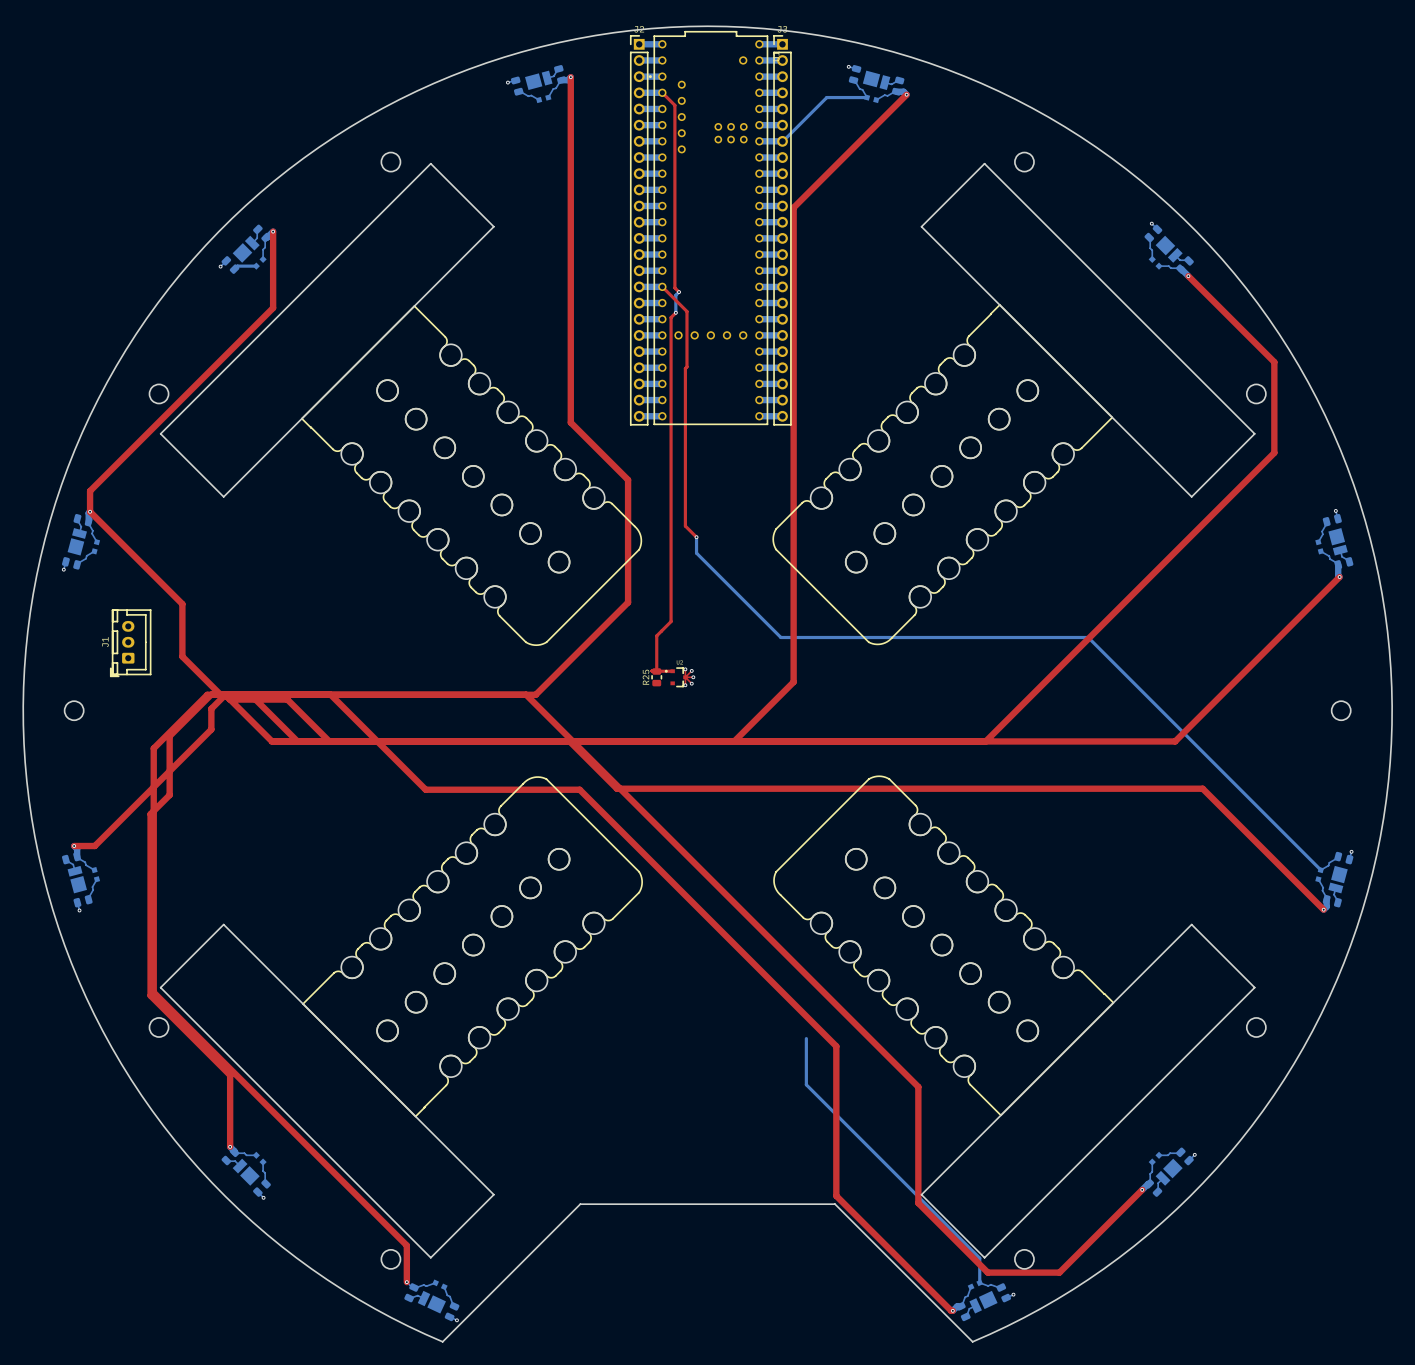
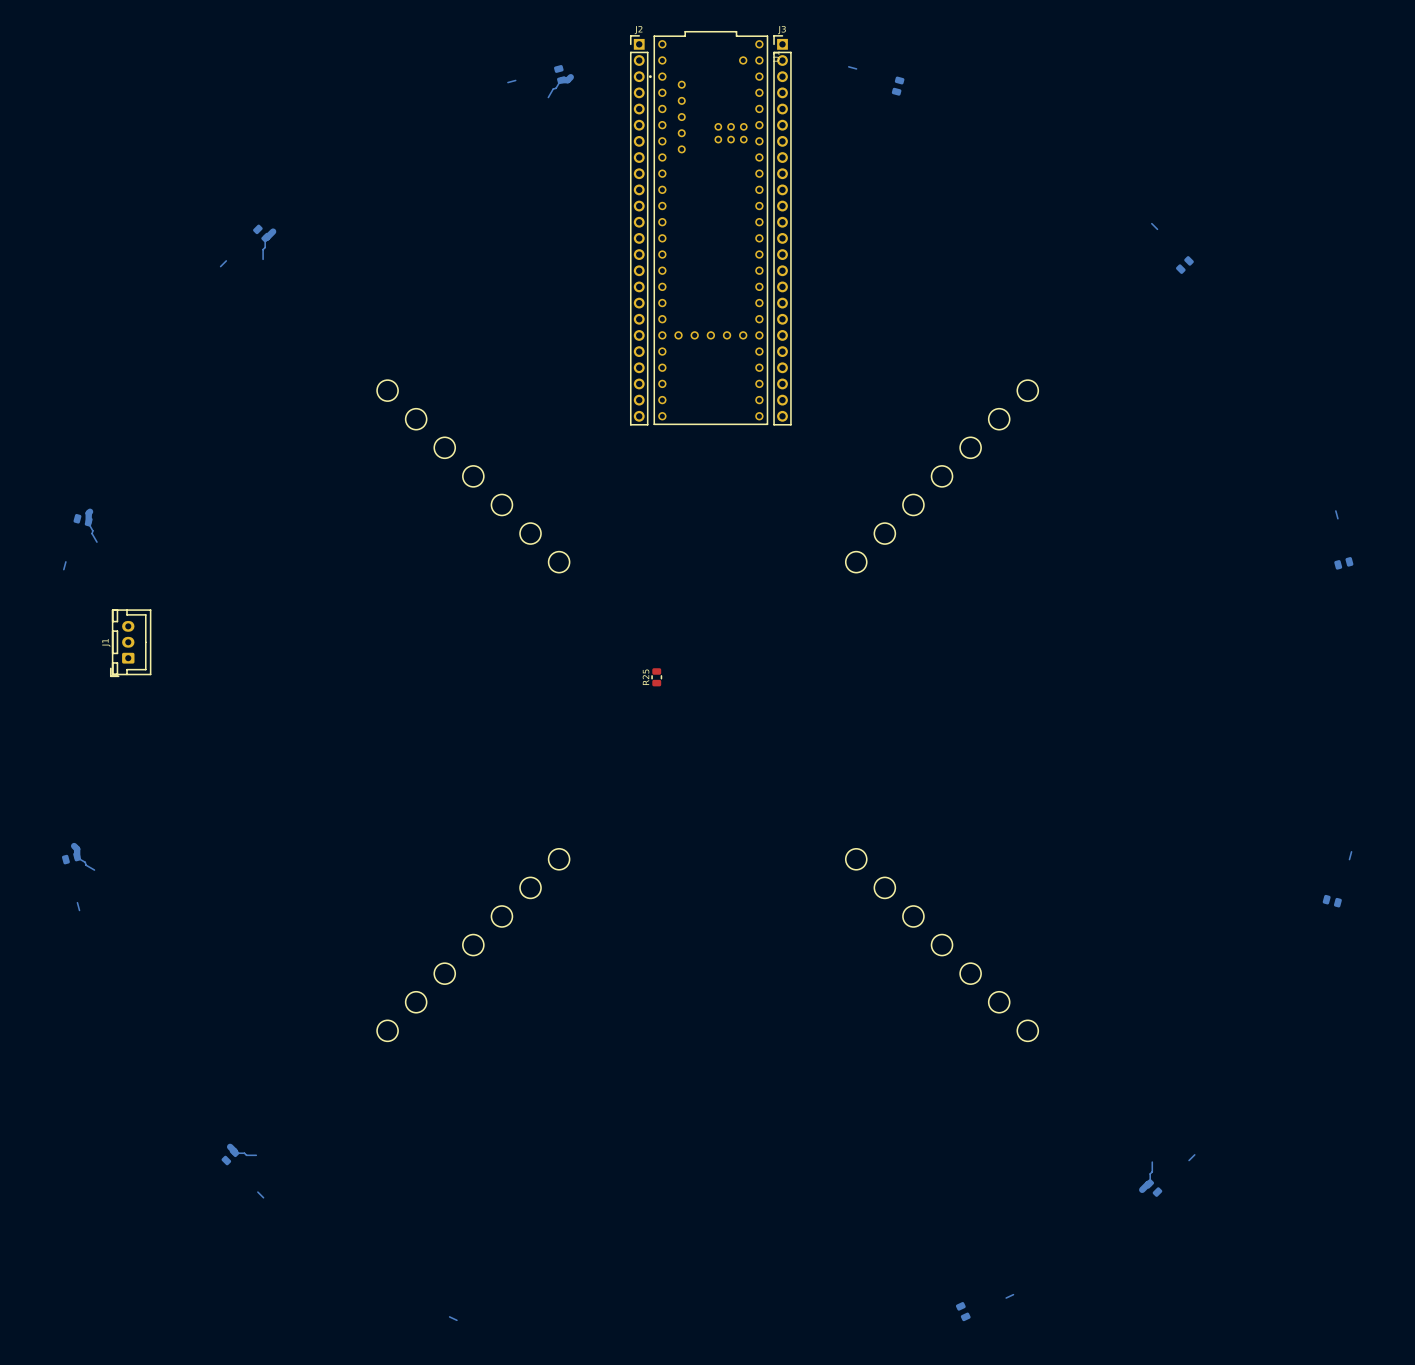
bottom track: (639, 44) (662, 44) -> none
bottom track: (759, 44) (782, 44) -> none
bottom track: (639, 60) (662, 60) -> none
bottom track: (759, 60) (782, 60) -> none
via: (848, 66) -> none
bottom track: (558, 68) (553, 76) (547, 78) -> none
part: (855, 74) -> none
bottom track: (639, 76) (662, 76) -> none
bottom track: (759, 76) (782, 76) -> none
top track: (570, 77) (570, 422) (628, 479) (628, 602) (535, 694) (207, 694) (153, 748) (153, 992) (406, 1245) (406, 1282) -> none
via: (570, 77) -> none
part: (538, 80) -> none
bottom track: (853, 80) (867, 97) (826, 97) (782, 141) -> none
part: (876, 80) -> none
bottom track: (899, 80) (891, 84) (884, 82) -> none
via: (507, 82) -> none
part: (517, 86) -> none
bottom track: (518, 91) (539, 100) -> none
bottom track: (639, 92) (662, 92) -> none
top track: (662, 92) (674, 105) (674, 287) (679, 292) -> none
bottom track: (759, 92) (782, 92) -> none
top track: (906, 94) (793, 207) (793, 682) (734, 741) -> none
bottom track: (906, 94) (903, 91) (895, 91) (876, 100) -> none
via: (906, 94) -> none
part: (543, 98) -> none
part: (871, 98) -> none
bottom track: (639, 108) (662, 108) -> none
bottom track: (759, 108) (782, 108) -> none
bottom track: (639, 125) (662, 125) -> none
bottom track: (759, 125) (782, 125) -> none
bottom track: (639, 141) (662, 141) -> none
bottom track: (759, 141) (782, 141) -> none
round board edge: [381, 152, 401, 172] -> none
round board edge: [1014, 152, 1035, 172] -> none
bottom track: (639, 157) (662, 157) -> none
bottom track: (759, 157) (782, 157) -> none
board edge: (430, 163) (493, 226) (223, 496) (160, 433) (430, 163) -> none
board edge: (984, 163) (921, 226) (1191, 496) (1254, 433) (984, 163) -> none
bottom track: (639, 173) (662, 173) -> none
bottom track: (759, 173) (782, 173) -> none
bottom track: (639, 189) (662, 189) -> none
bottom track: (759, 189) (782, 189) -> none
bottom track: (639, 206) (662, 206) -> none
bottom track: (759, 206) (782, 206) -> none
bottom track: (639, 222) (662, 222) -> none
bottom track: (759, 222) (782, 222) -> none
via: (1151, 223) -> none
bottom track: (257, 229) (257, 238) (252, 243) -> none
top track: (273, 231) (273, 308) (90, 491) (90, 511) (182, 604) (182, 656) (220, 694) -> none
via: (273, 231) -> none
part: (1153, 233) -> none
bottom track: (1149, 237) (1152, 259) -> none
bottom track: (639, 238) (662, 238) -> none
bottom track: (759, 238) (782, 238) -> none
part: (246, 249) -> none
part: (1169, 249) -> none
bottom track: (639, 254) (662, 254) -> none
bottom track: (759, 254) (782, 254) -> none
bottom track: (1175, 255) (1180, 260) (1189, 260) -> none
part: (259, 262) -> none
part: (1155, 262) -> none
part: (230, 265) -> none
via: (220, 266) -> none
bottom track: (256, 266) (237, 266) (235, 268) -> none
bottom track: (1159, 266) (1179, 268) (1188, 276) -> none
bottom track: (639, 270) (662, 270) -> none
bottom track: (759, 270) (782, 270) -> none
top track: (1188, 276) (1274, 362) (1274, 452) (985, 741) -> none
via: (1188, 276) -> none
bottom track: (639, 286) (662, 286) -> none
top track: (662, 286) (686, 311) (685, 526) (696, 537) -> none
bottom track: (759, 286) (782, 286) -> none
bottom track: (679, 292) (675, 295) (675, 312) -> none
via: (679, 292) -> none
bottom track: (639, 303) (662, 303) -> none
bottom track: (759, 303) (782, 303) -> none
line: (999, 304) (1112, 417) (1079, 449) (1074, 449) (1064, 443) (1055, 446) (1052, 454) (1059, 465) (1057, 472) (1048, 478) (1036, 471) (1027, 474) (1023, 483) (1030, 494) (1028, 500) (1020, 507) (1008, 500) (998, 503) (995, 511) (1001, 522) (1000, 529) (991, 535) (979, 529) (970, 531) (966, 540) (973, 551) (971, 558) (963, 564) (951, 557) (942, 559) (938, 569) (944, 580) (943, 586) (934, 593) (922, 586) (913, 588) (909, 597) (916, 608) (915, 614) (887, 641) (879, 644) (870, 643) (776, 549) (773, 541) (774, 532) (804, 501) (809, 501) (820, 508) (829, 505) (831, 495) (824, 482) (832, 473) (837, 472) (848, 480) (857, 477) (860, 466) (852, 454) (860, 445) (866, 444) (877, 451) (886, 448) (889, 438) (881, 426) (888, 416) (894, 415) (906, 423) (914, 419) (917, 409) (910, 397) (917, 387) (923, 386) (934, 394) (943, 391) (946, 381) (938, 369) (945, 359) (952, 358) (963, 365) (972, 362) (975, 353) (967, 343) (967, 338) (999, 304) -> none
line: (414, 306) (446, 338) (446, 344) (440, 354) (443, 362) (451, 365) (462, 359) (468, 360) (475, 369) (468, 381) (471, 391) (480, 394) (491, 387) (497, 388) (504, 398) (497, 410) (500, 419) (508, 423) (519, 416) (525, 417) (532, 426) (526, 438) (529, 448) (537, 451) (548, 445) (554, 446) (561, 455) (554, 467) (557, 477) (566, 480) (577, 473) (582, 474) (589, 483) (583, 495) (586, 505) (594, 508) (604, 502) (610, 502) (639, 533) (641, 541) (639, 549) (542, 644) (534, 645) (525, 642) (499, 615) (498, 609) (505, 598) (501, 588) (492, 586) (480, 594) (470, 586) (469, 580) (477, 569) (473, 559) (463, 557) (451, 565) (441, 558) (441, 552) (448, 540) (445, 532) (435, 529) (423, 536) (413, 530) (412, 523) (420, 512) (416, 503) (406, 500) (394, 508) (385, 501) (383, 494) (391, 483) (388, 474) (378, 472) (366, 479) (356, 473) (355, 466) (362, 455) (359, 446) (350, 443) (340, 450) (335, 450) (301, 418) (414, 306) -> none
top track: (675, 312) (671, 317) (671, 621) (656, 635) (656, 671) -> none
via: (675, 312) -> none
bottom track: (639, 319) (662, 319) -> none
bottom track: (759, 319) (782, 319) -> none
bottom track: (639, 335) (662, 335) -> none
bottom track: (759, 335) (782, 335) -> none
round board edge: [439, 344, 463, 367] -> none
round board edge: [953, 344, 976, 367] -> none
bottom track: (639, 351) (662, 351) -> none
bottom track: (759, 351) (782, 351) -> none
bottom track: (639, 367) (662, 367) -> none
bottom track: (759, 367) (782, 367) -> none
round board edge: [468, 372, 491, 395] -> none
round board edge: [924, 372, 947, 395] -> none
round board edge: [376, 379, 399, 402] -> none
round board edge: [1016, 379, 1039, 402] -> none
bottom track: (639, 383) (662, 383) -> none
bottom track: (759, 383) (782, 383) -> none
round board edge: [149, 384, 169, 404] -> none
round board edge: [1246, 384, 1267, 404] -> none
bottom track: (639, 400) (662, 400) -> none
bottom track: (759, 400) (782, 400) -> none
round board edge: [496, 401, 520, 424] -> none
round board edge: [896, 401, 919, 424] -> none
round board edge: [405, 408, 427, 431] -> none
round board edge: [988, 408, 1011, 431] -> none
bottom track: (639, 416) (662, 416) -> none
bottom track: (759, 416) (782, 416) -> none
round board edge: [525, 429, 548, 453] -> none
round board edge: [867, 429, 890, 453] -> none
round board edge: [433, 436, 456, 459] -> none
round board edge: [959, 436, 982, 459] -> none
round board edge: [340, 442, 364, 466] -> none
round board edge: [1052, 442, 1075, 466] -> none
round board edge: [554, 458, 577, 481] -> none
round board edge: [838, 458, 862, 481] -> none
round board edge: [462, 465, 485, 488] -> none
round board edge: [931, 465, 953, 488] -> none
round board edge: [369, 471, 392, 494] -> none
round board edge: [1023, 471, 1046, 494] -> none
round board edge: [582, 486, 606, 510] -> none
round board edge: [810, 486, 833, 510] -> none
round board edge: [491, 494, 513, 516] -> none
round board edge: [902, 494, 925, 516] -> none
round board edge: [398, 500, 421, 523] -> none
round board edge: [994, 500, 1018, 523] -> none
via: (1335, 510) -> none
via: (90, 511) -> none
bottom track: (77, 518) (81, 526) (79, 533) -> none
part: (1332, 520) -> none
bottom track: (1326, 521) (1318, 542) -> none
round board edge: [519, 522, 542, 545] -> none
round board edge: [874, 522, 896, 545] -> none
round board edge: [426, 528, 450, 551] -> none
round board edge: [966, 528, 989, 551] -> none
bottom track: (696, 537) (696, 553) (780, 637) (1088, 637) (1320, 870) (1338, 856) -> none
via: (696, 537) -> none
part: (77, 541) -> none
part: (1338, 541) -> none
part: (95, 546) -> none
part: (1319, 546) -> none
bottom track: (1340, 550) (1342, 556) (1349, 561) -> none
bottom track: (94, 551) (77, 564) -> none
round board edge: [548, 551, 570, 573] -> none
round board edge: [845, 551, 868, 573] -> none
bottom track: (1320, 551) (1337, 563) (1339, 577) -> none
round board edge: [455, 557, 478, 580] -> none
round board edge: [937, 557, 961, 580] -> none
part: (71, 563) -> none
via: (63, 569) -> none
top track: (1339, 577) (1175, 741) (272, 741) (225, 694) (211, 708) (211, 729) (94, 846) (74, 846) -> none
via: (1339, 577) -> none
round board edge: [483, 585, 507, 609] -> none
round board edge: [909, 585, 932, 609] -> none
top track: (685, 669) (685, 685) -> none
via: (685, 669) -> none
top track: (691, 670) (685, 677) -> none
via: (691, 670) -> none
top track: (672, 671) (652, 671) (651, 670) (656, 670) (656, 671) -> none
part: (676, 677) -> none
top track: (685, 677) (691, 683) -> none
top track: (685, 677) (693, 677) -> none
via: (693, 677) -> none
via: (691, 683) -> none
via: (685, 685) -> none
top track: (211, 694) (169, 736) (169, 795) (150, 814) (150, 995) (230, 1075) (230, 1146) -> none
top track: (250, 694) (297, 741) -> none
top track: (330, 694) (425, 789) (579, 789) (836, 1046) (836, 1195) (952, 1310) -> none
top track: (526, 694) (918, 1086) (918, 1203) (987, 1272) (1059, 1272) (1142, 1189) -> none
top track: (230, 699) (287, 699) (329, 741) -> none
round board edge: [64, 700, 85, 721] -> none
round board edge: [1331, 700, 1352, 721] -> none
top track: (569, 741) (616, 788) (1202, 788) (1323, 909) -> none
line: (546, 779) (639, 871) (642, 880) (641, 888) (610, 920) (605, 919) (595, 912) (586, 915) (583, 925) (591, 938) (583, 948) (577, 948) (566, 941) (557, 944) (554, 954) (562, 966) (555, 976) (548, 977) (537, 969) (529, 972) (526, 983) (533, 995) (526, 1005) (520, 1005) (509, 998) (500, 1001) (497, 1011) (505, 1023) (497, 1033) (491, 1034) (480, 1026) (471, 1030) (469, 1040) (476, 1052) (469, 1062) (463, 1063) (452, 1055) (443, 1058) (440, 1067) (447, 1077) (447, 1083) (415, 1116) (303, 1003) (335, 971) (341, 971) (351, 978) (359, 975) (362, 966) (356, 955) (357, 949) (366, 942) (378, 949) (388, 946) (391, 938) (384, 927) (386, 920) (395, 914) (407, 920) (415, 918) (420, 909) (413, 898) (415, 891) (423, 885) (435, 892) (444, 890) (448, 880) (442, 869) (443, 863) (452, 856) (464, 863) (473, 861) (477, 852) (470, 841) (472, 834) (480, 828) (492, 835) (501, 833) (505, 823) (499, 812) (500, 806) (528, 779) (538, 777) (546, 779) -> none
line: (868, 779) (776, 871) (774, 880) (775, 888) (805, 918) (810, 918) (820, 912) (829, 915) (832, 925) (825, 938) (832, 947) (838, 947) (849, 941) (857, 944) (860, 954) (853, 966) (860, 975) (866, 976) (877, 969) (886, 972) (889, 982) (882, 994) (889, 1003) (895, 1004) (906, 998) (914, 1001) (917, 1011) (911, 1023) (918, 1032) (924, 1033) (935, 1026) (943, 1030) (946, 1039) (939, 1051) (946, 1061) (952, 1062) (963, 1055) (972, 1058) (975, 1067) (968, 1077) (968, 1082) (1000, 1115) (1113, 1002) (1080, 970) (1074, 970) (1064, 978) (1055, 975) (1052, 966) (1060, 955) (1058, 948) (1049, 941) (1037, 949) (1027, 946) (1023, 937) (1031, 926) (1030, 919) (1020, 913) (1008, 920) (999, 918) (995, 909) (1002, 898) (1001, 891) (992, 884) (980, 892) (970, 890) (966, 880) (974, 869) (972, 862) (963, 855) (951, 863) (942, 861) (938, 851) (945, 840) (944, 834) (934, 827) (922, 835) (913, 833) (909, 823) (917, 812) (916, 806) (889, 779) (879, 776) (868, 779) -> none
round board edge: [483, 813, 507, 836] -> none
round board edge: [909, 813, 932, 836] -> none
round board edge: [455, 841, 478, 865] -> none
round board edge: [937, 841, 961, 865] -> none
via: (74, 846) -> none
round board edge: [548, 848, 570, 871] -> none
round board edge: [845, 848, 868, 871] -> none
via: (1351, 851) -> none
part: (1343, 858) -> none
bottom track: (65, 859) (73, 864) (75, 871) -> none
round board edge: [426, 870, 450, 893] -> none
round board edge: [966, 870, 989, 893] -> none
part: (95, 874) -> none
part: (1319, 874) -> none
round board edge: [519, 877, 542, 899] -> none
round board edge: [874, 877, 896, 899] -> none
part: (77, 879) -> none
bottom track: (96, 879) (88, 899) -> none
bottom track: (1318, 879) (1327, 898) (1326, 906) (1323, 909) -> none
part: (1338, 879) -> none
bottom track: (1335, 887) (1334, 894) (1337, 902) -> none
round board edge: [398, 899, 421, 922] -> none
round board edge: [994, 899, 1018, 922] -> none
part: (83, 901) -> none
round board edge: [491, 905, 513, 928] -> none
round board edge: [902, 905, 925, 928] -> none
via: (1323, 909) -> none
via: (79, 910) -> none
round board edge: [582, 912, 606, 935] -> none
round board edge: [810, 912, 833, 935] -> none
board edge: (223, 924) (160, 987) (430, 1257) (493, 1194) (223, 924) -> none
board edge: (1191, 924) (1254, 987) (984, 1257) (921, 1194) (1191, 924) -> none
round board edge: [369, 927, 392, 950] -> none
round board edge: [1023, 927, 1046, 950] -> none
round board edge: [462, 934, 485, 956] -> none
round board edge: [931, 934, 953, 956] -> none
round board edge: [554, 940, 577, 964] -> none
round board edge: [838, 940, 862, 964] -> none
round board edge: [340, 956, 364, 979] -> none
round board edge: [1052, 956, 1075, 979] -> none
round board edge: [433, 962, 456, 985] -> none
round board edge: [959, 962, 982, 985] -> none
round board edge: [525, 969, 548, 992] -> none
round board edge: [867, 969, 890, 992] -> none
round board edge: [405, 991, 427, 1014] -> none
round board edge: [988, 991, 1011, 1014] -> none
round board edge: [496, 997, 520, 1021] -> none
round board edge: [896, 997, 919, 1021] -> none
round board edge: [149, 1017, 169, 1038] -> none
round board edge: [1246, 1017, 1267, 1038] -> none
round board edge: [376, 1020, 399, 1042] -> none
round board edge: [1016, 1020, 1039, 1042] -> none
round board edge: [468, 1026, 491, 1049] -> none
round board edge: [924, 1026, 947, 1049] -> none
bottom track: (806, 1038) (806, 1084) (979, 1258) (979, 1282) (1001, 1287) -> none
round board edge: [439, 1055, 463, 1078] -> none
round board edge: [953, 1055, 976, 1078] -> none
via: (230, 1146) -> none
bottom track: (1180, 1152) (1159, 1155) -> none
via: (1194, 1154) -> none
part: (1184, 1156) -> none
part: (259, 1158) -> none
part: (1155, 1158) -> none
bottom track: (226, 1160) (235, 1161) (240, 1166) -> none
bottom track: (263, 1162) (266, 1183) -> none
part: (246, 1172) -> none
part: (1169, 1172) -> none
bottom track: (1163, 1178) (1158, 1183) (1157, 1192) -> none
part: (261, 1187) -> none
via: (1142, 1189) -> none
via: (263, 1197) -> none
board edge: (580, 1204) (835, 1204) (972, 1341) (1040, 1308) (1088, 1279) (1118, 1257) (1176, 1209) (1228, 1155) (1273, 1095) (1294, 1063) (1321, 1014) (1350, 945) (1372, 873) (1386, 799) (1391, 743) (1391, 687) (1385, 612) (1370, 538) (1353, 485) (1333, 432) (1298, 365) (1257, 303) (1222, 259) (1183, 218) (1126, 169) (1064, 126) (998, 91) (946, 69) (875, 47) (801, 32) (745, 27) (670, 27) (614, 32) (540, 47) (486, 63) (416, 91) (350, 126) (303, 158) (245, 205) (193, 259) (157, 303) (126, 349) (90, 415) (67, 467) (45, 538) (30, 612) (23, 687) (25, 762) (29, 799) (38, 855) (58, 927) (78, 980) (94, 1014) (131, 1079) (175, 1140) (199, 1169) (239, 1209) (296, 1257) (358, 1299) (391, 1317) (442, 1341) (580, 1204) -> none
round board edge: [381, 1249, 401, 1270] -> none
round board edge: [1014, 1249, 1035, 1270] -> none
bottom track: (406, 1282) (415, 1288) (435, 1282) -> none
via: (406, 1282) -> none
part: (439, 1284) -> none
part: (975, 1284) -> none
bottom track: (444, 1286) (454, 1306) -> none
bottom track: (971, 1286) (962, 1305) (957, 1306) (952, 1310) -> none
part: (411, 1292) -> none
part: (1003, 1292) -> none
via: (1013, 1294) -> none
bottom track: (409, 1298) (417, 1295) (424, 1298) -> none
part: (431, 1302) -> none
part: (983, 1302) -> none
bottom track: (975, 1305) (969, 1308) (965, 1316) -> none
via: (952, 1310) -> none
part: (452, 1311) -> none
via: (456, 1320) -> none

